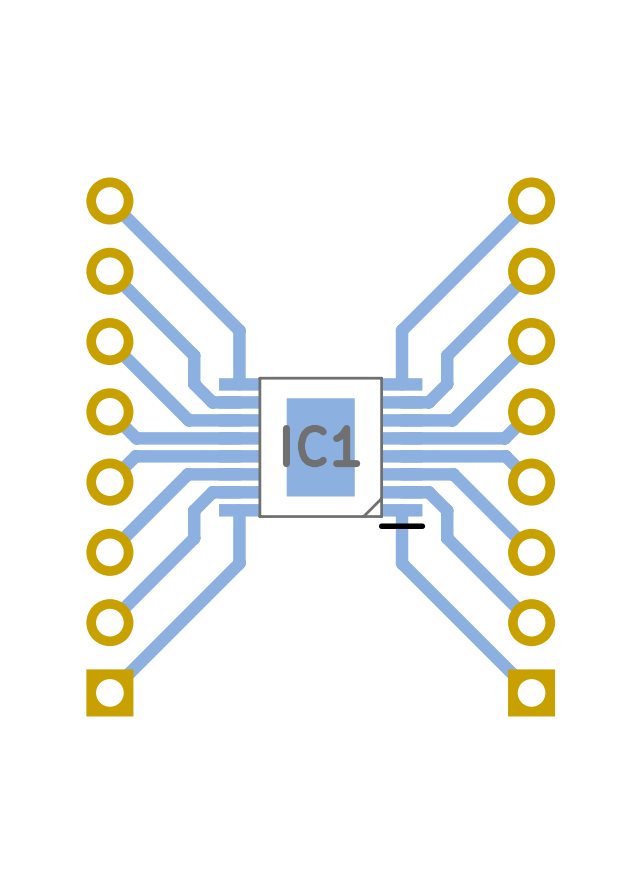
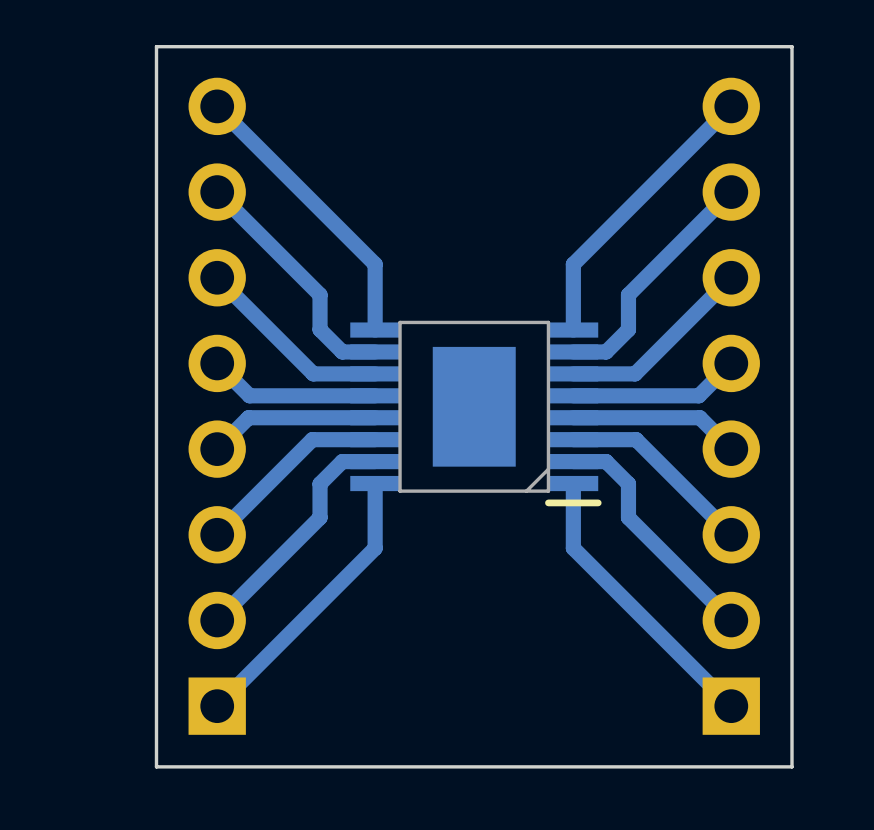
board edge: none -> (792, 46) (156, 46) (156, 766) (792, 766) (792, 46)
IC1 name: IC1 (321, 446) -> none

